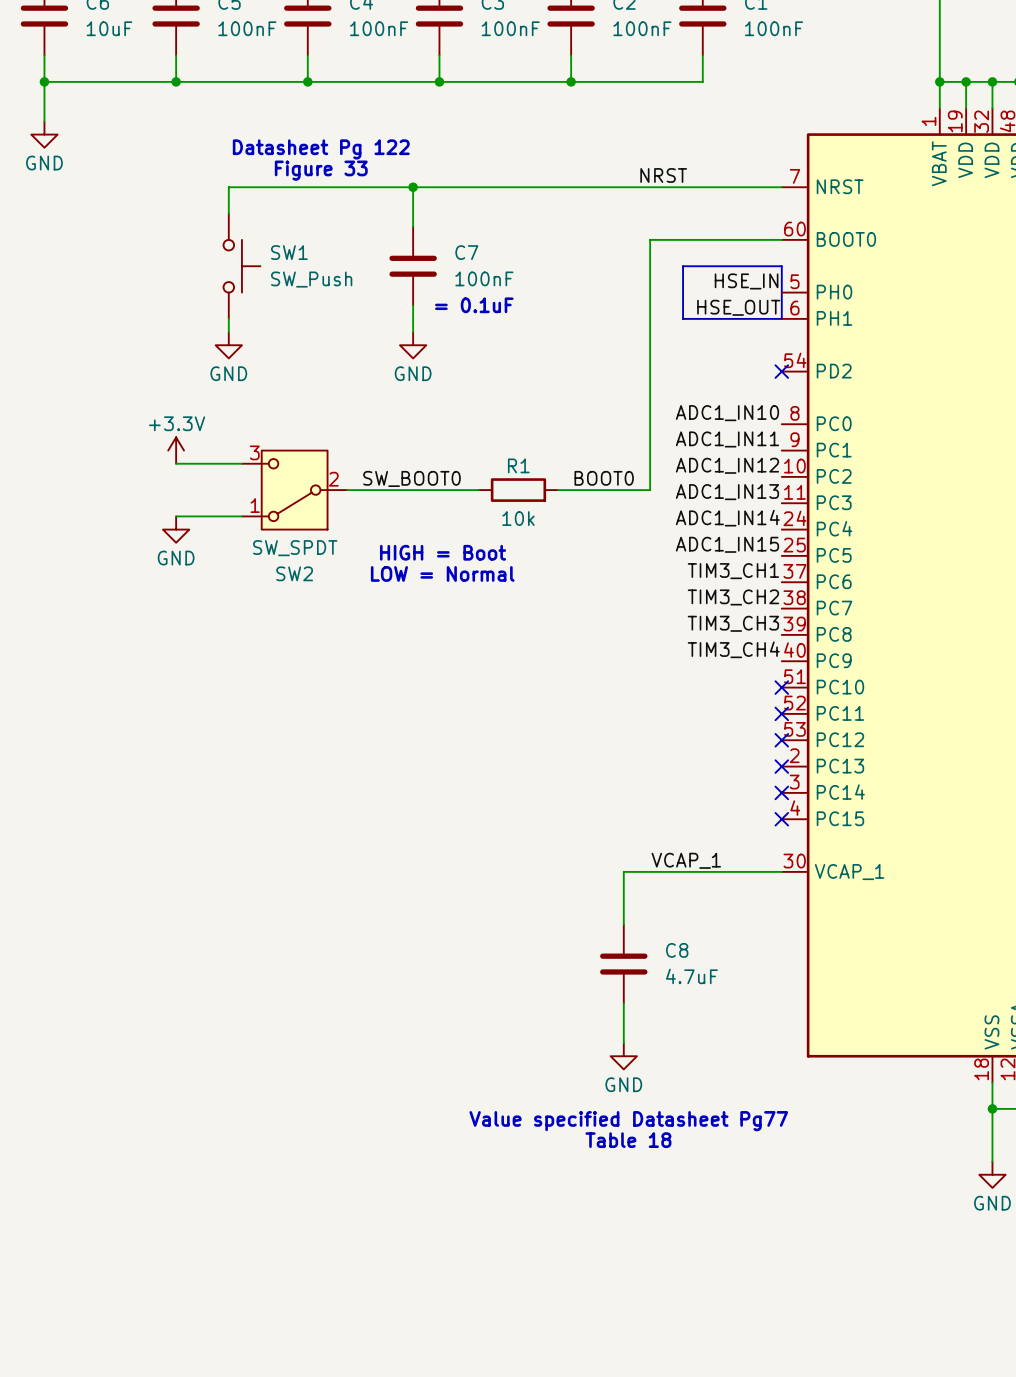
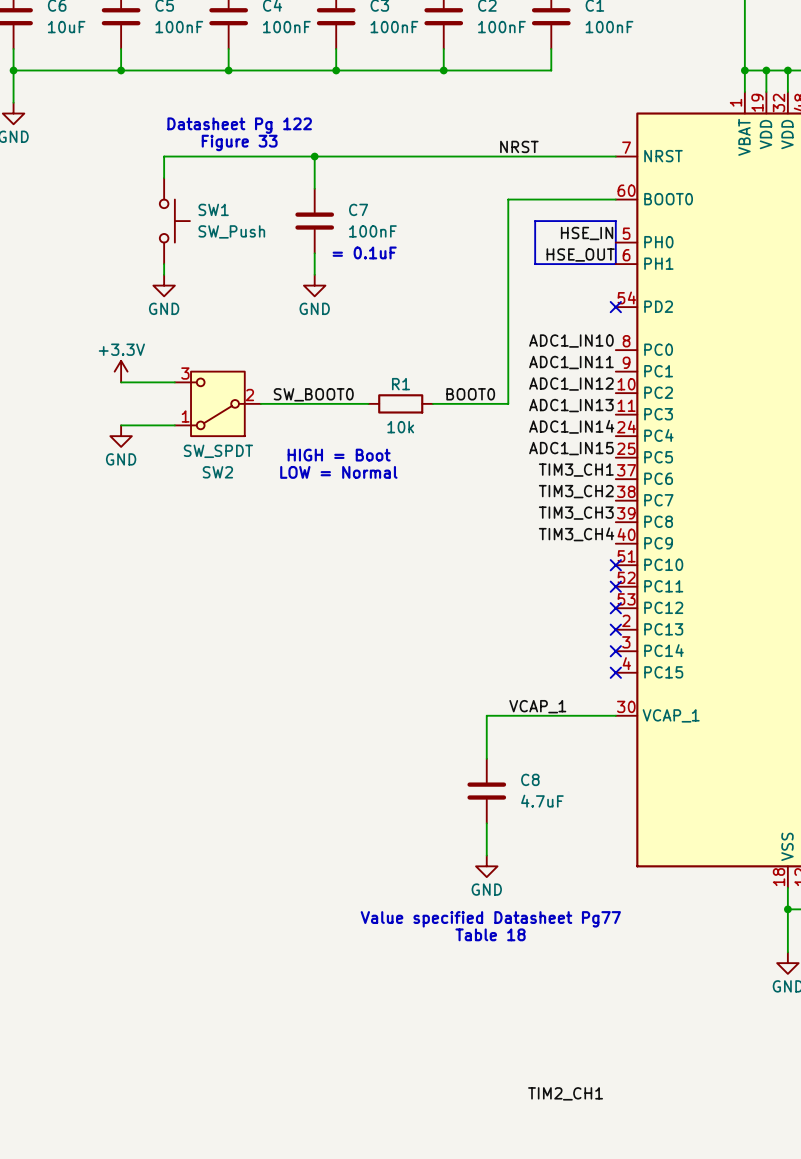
label: none -> TIM2_CH1 (565, 1093)

